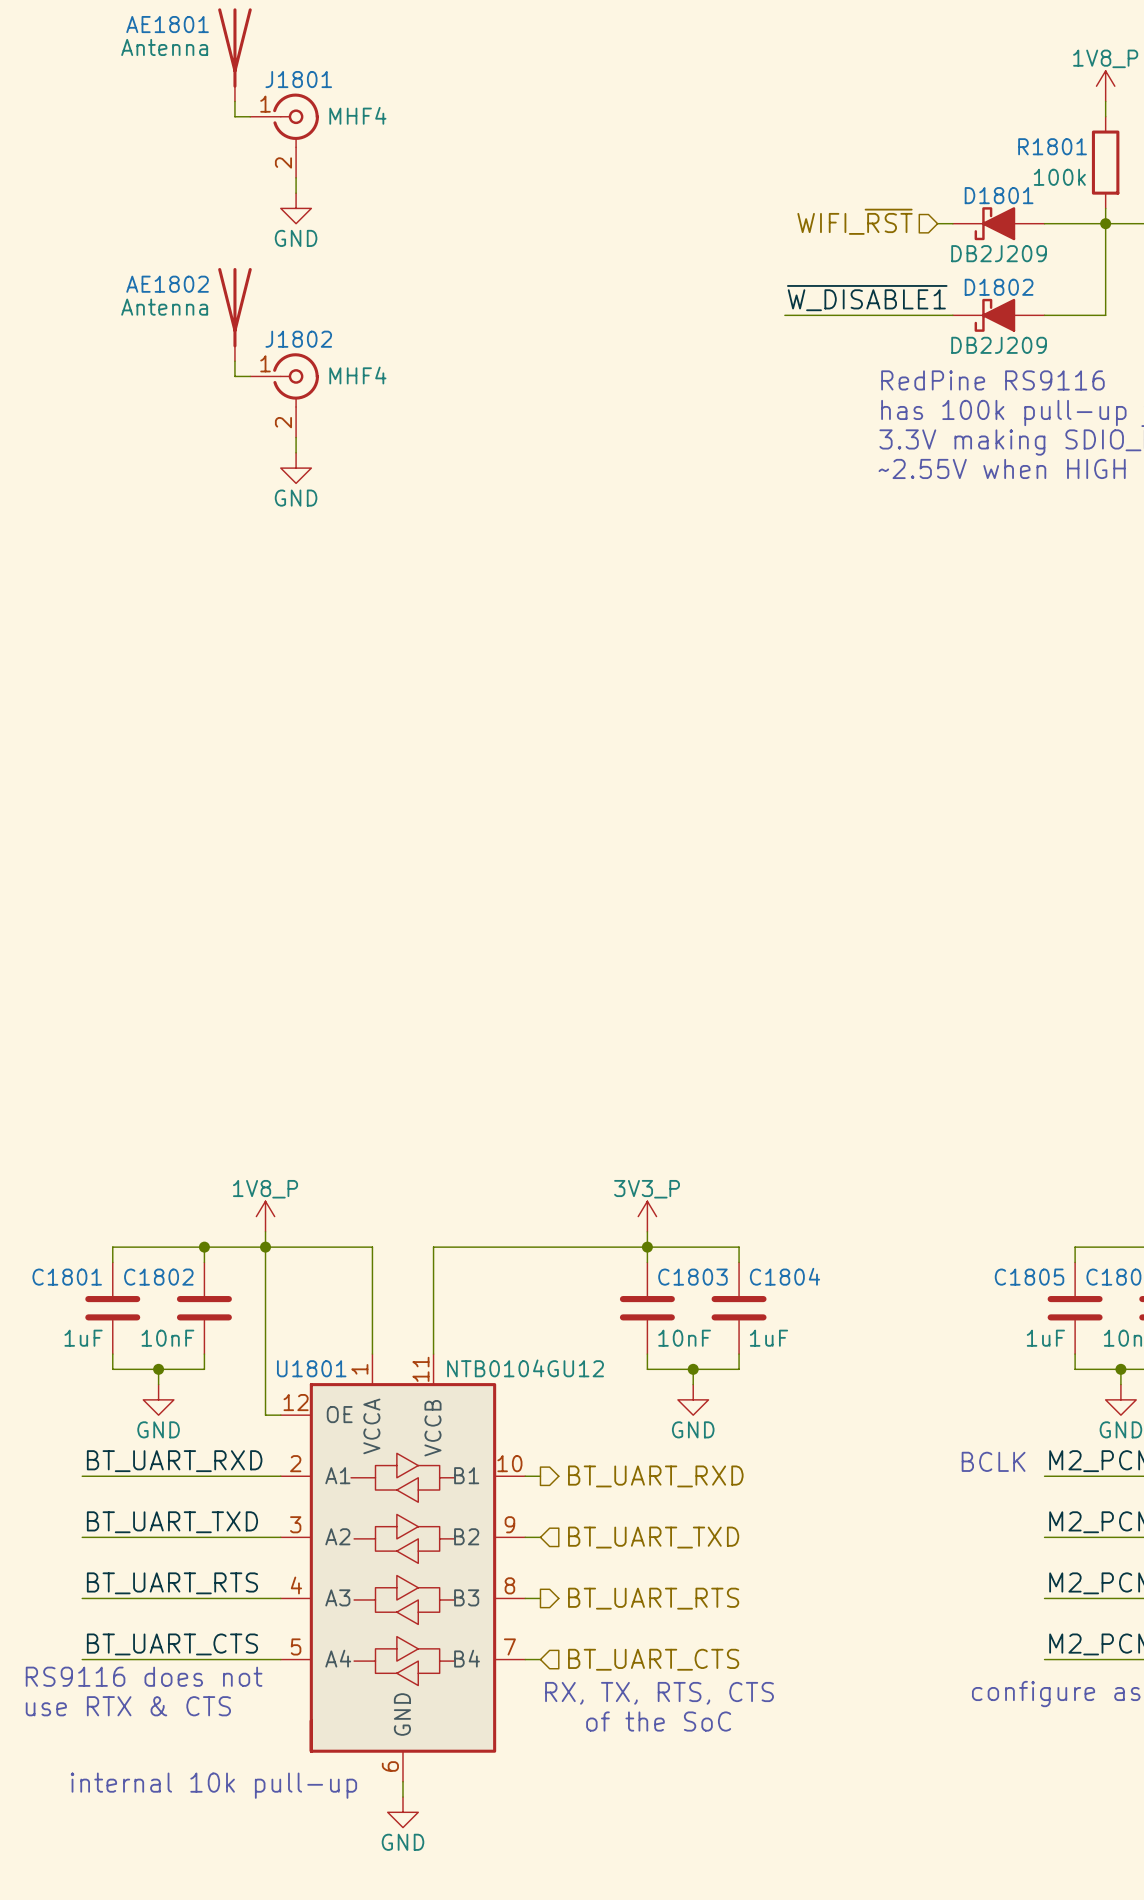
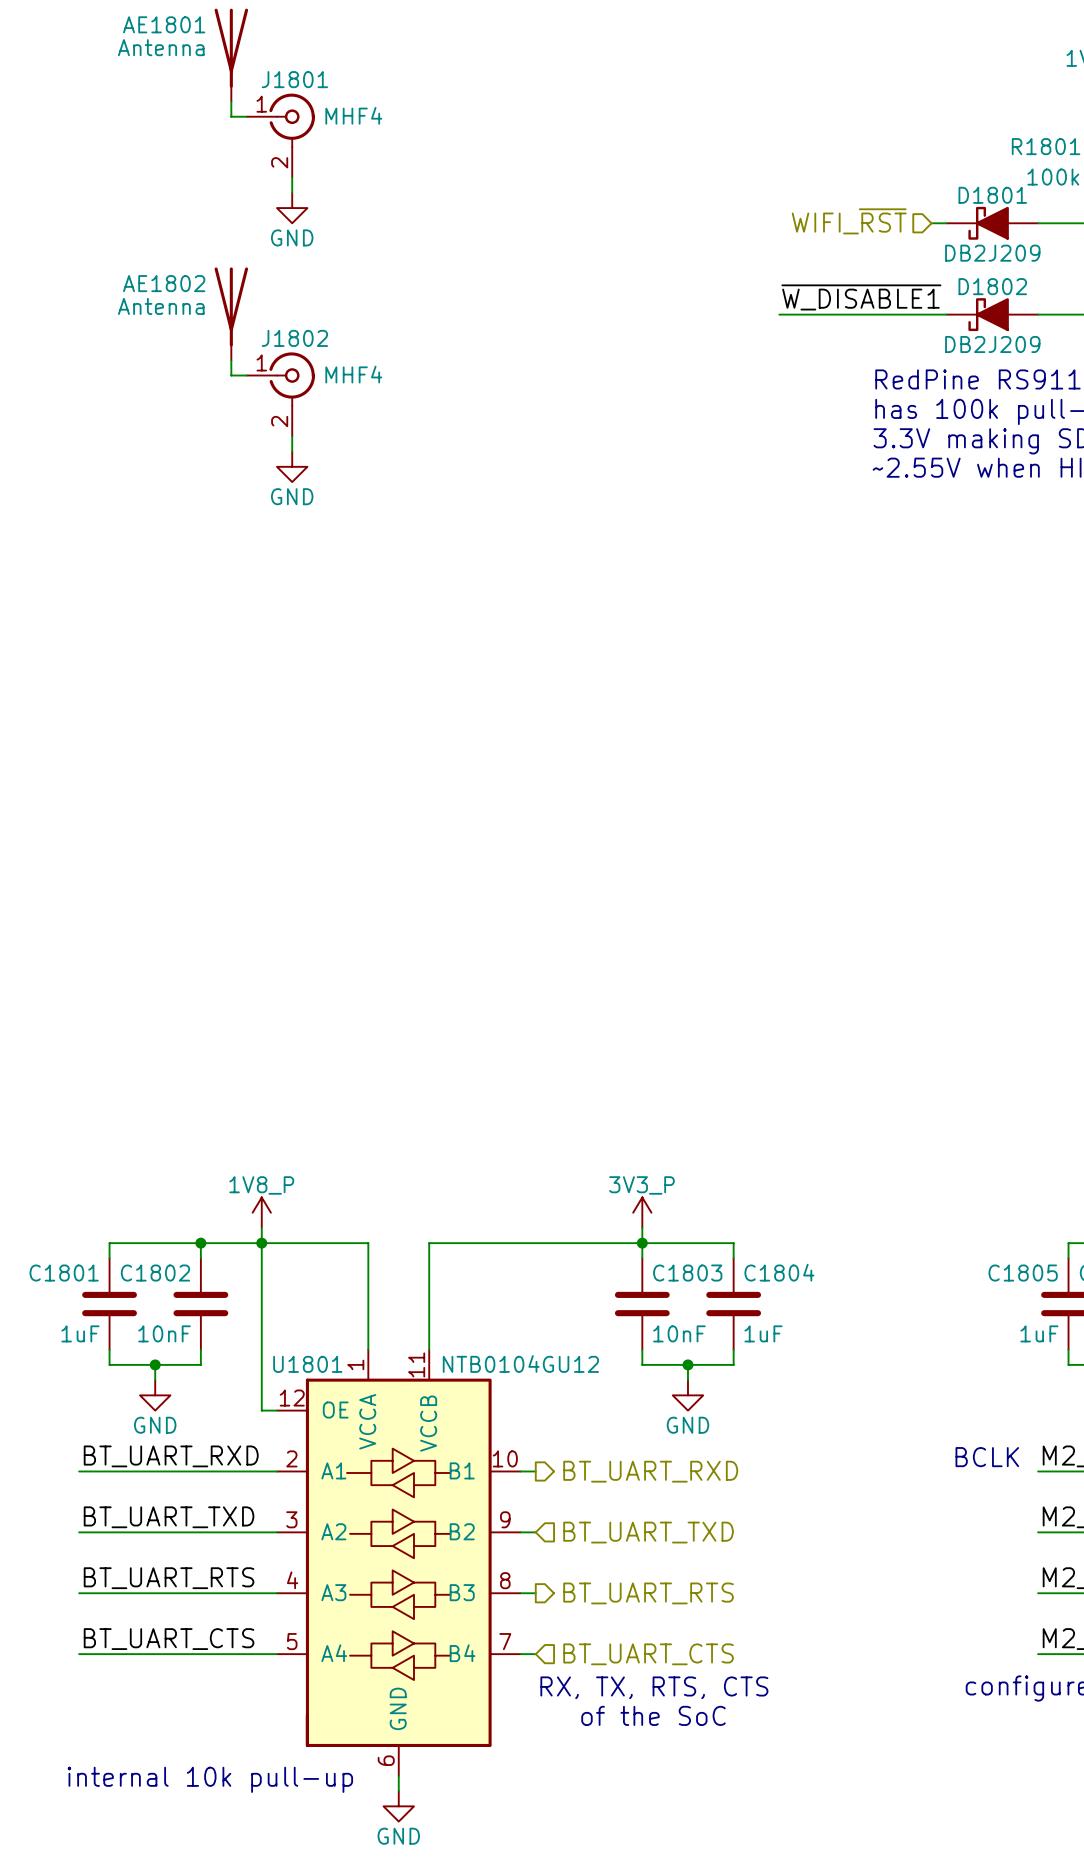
text: RS9116 does not (144, 1676) -> none
text: use RTX & CTS (128, 1706) -> none

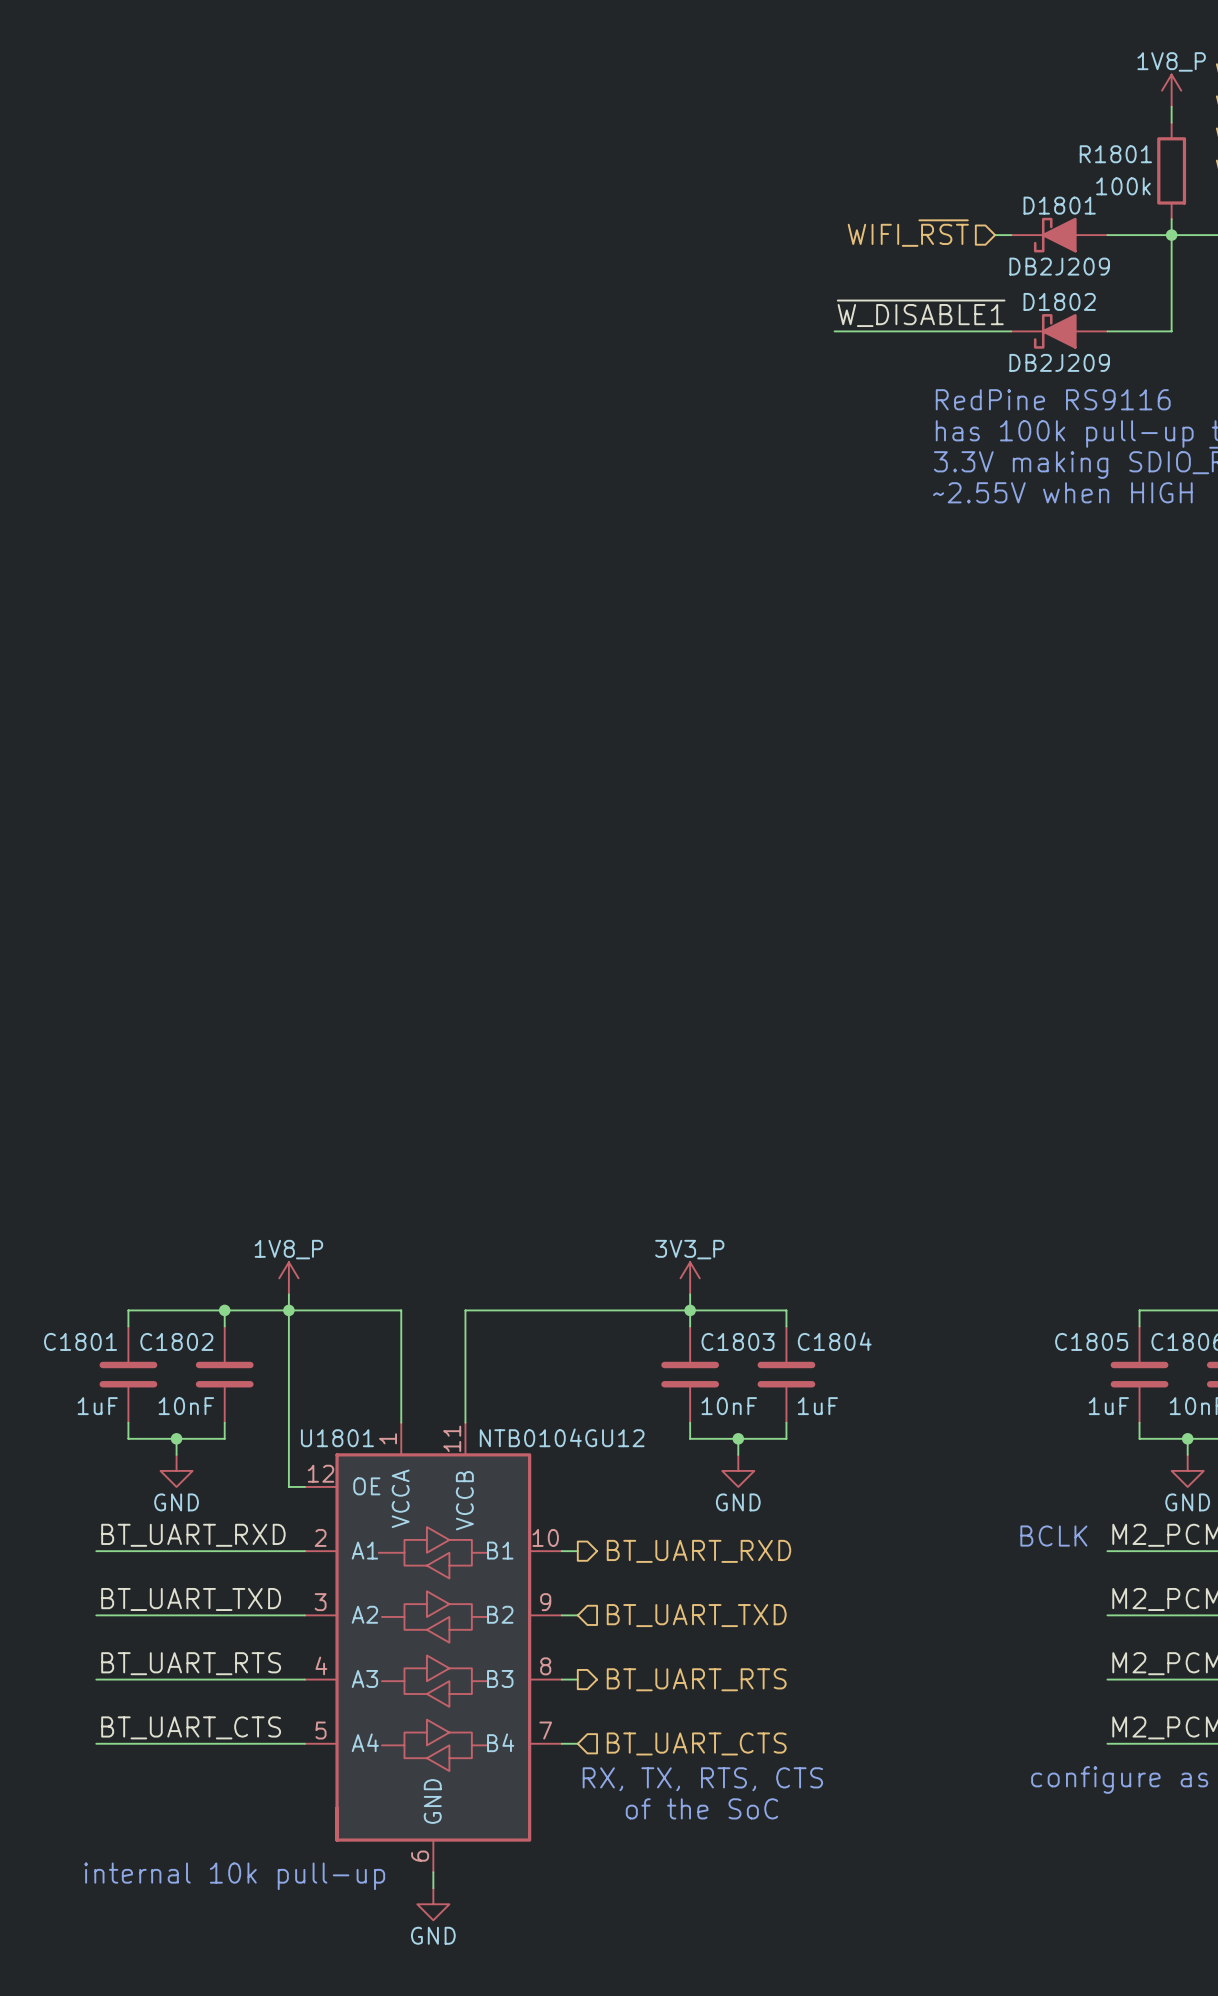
AE1801: Antenna (231, 55) -> none
wire: (231, 101) (231, 116) (246, 116) -> none
J1801: MHF4 (280, 135) -> none
wire: (292, 177) (292, 192) -> none
power symbol: GND (292, 208) -> none
AE1802: Antenna (231, 313) -> none
wire: (231, 360) (231, 375) (246, 375) -> none
J1802: MHF4 (280, 394) -> none
wire: (292, 436) (292, 451) -> none
power symbol: GND (292, 466) -> none

